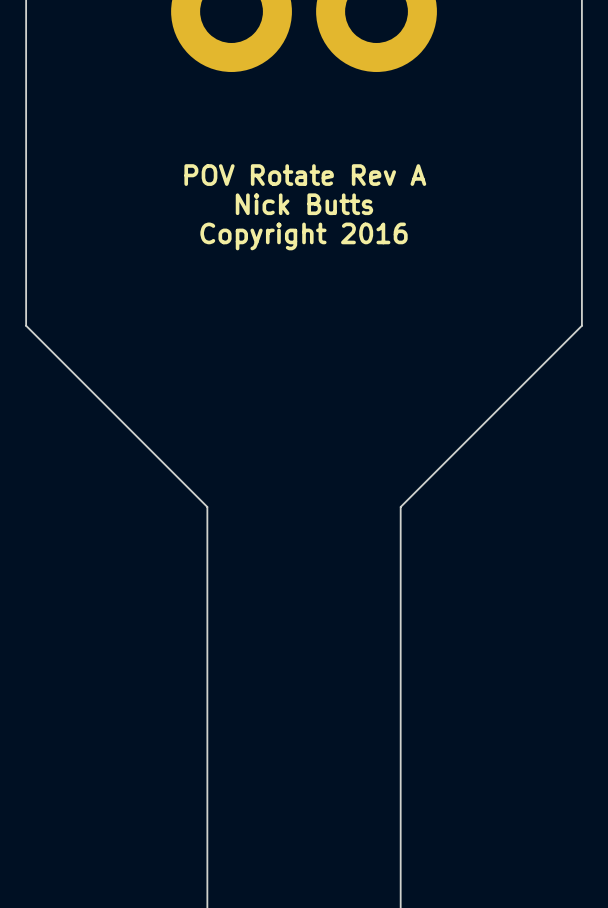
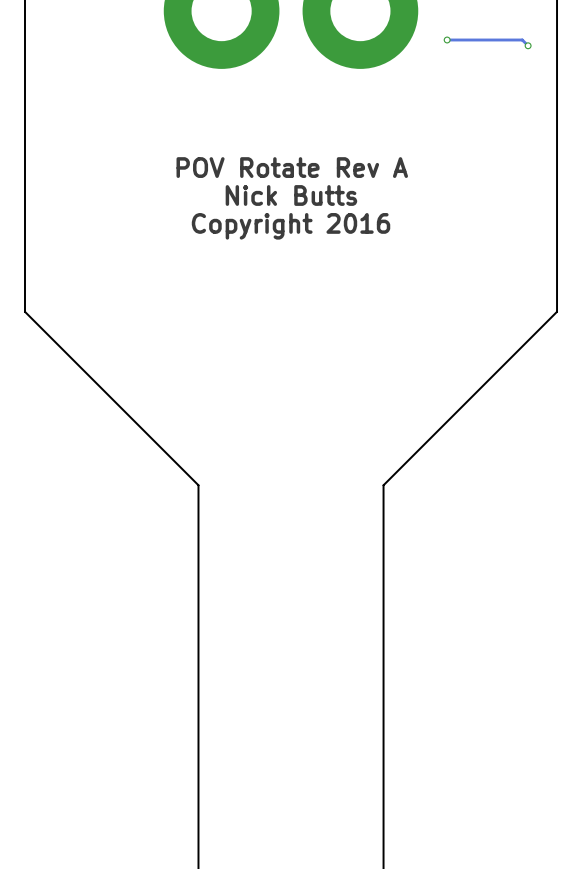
track: none -> (447, 40) (522, 40) (528, 45)
via: none -> (447, 40)
via: none -> (528, 45)

